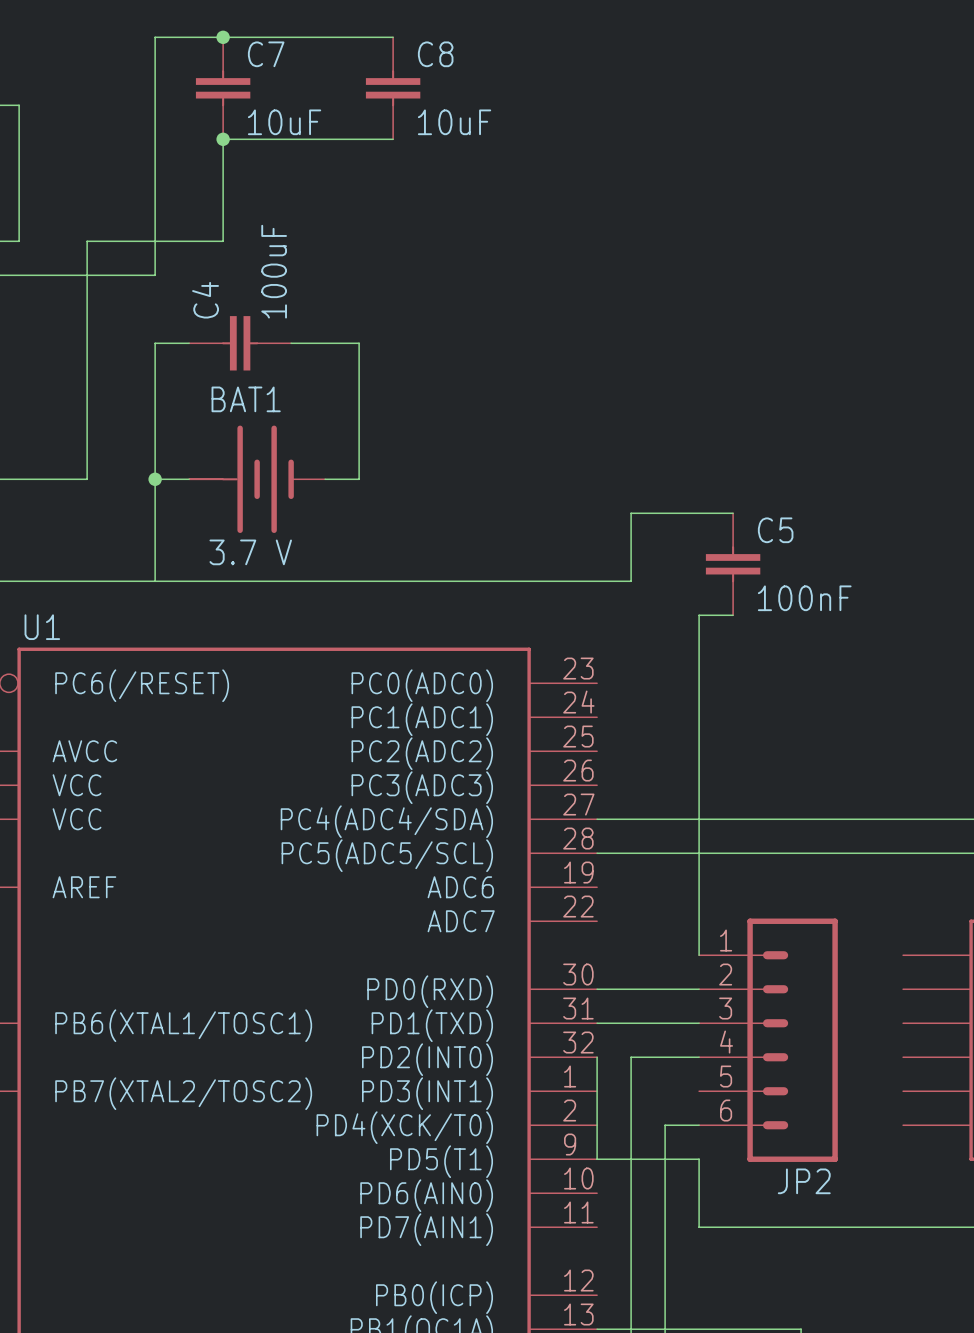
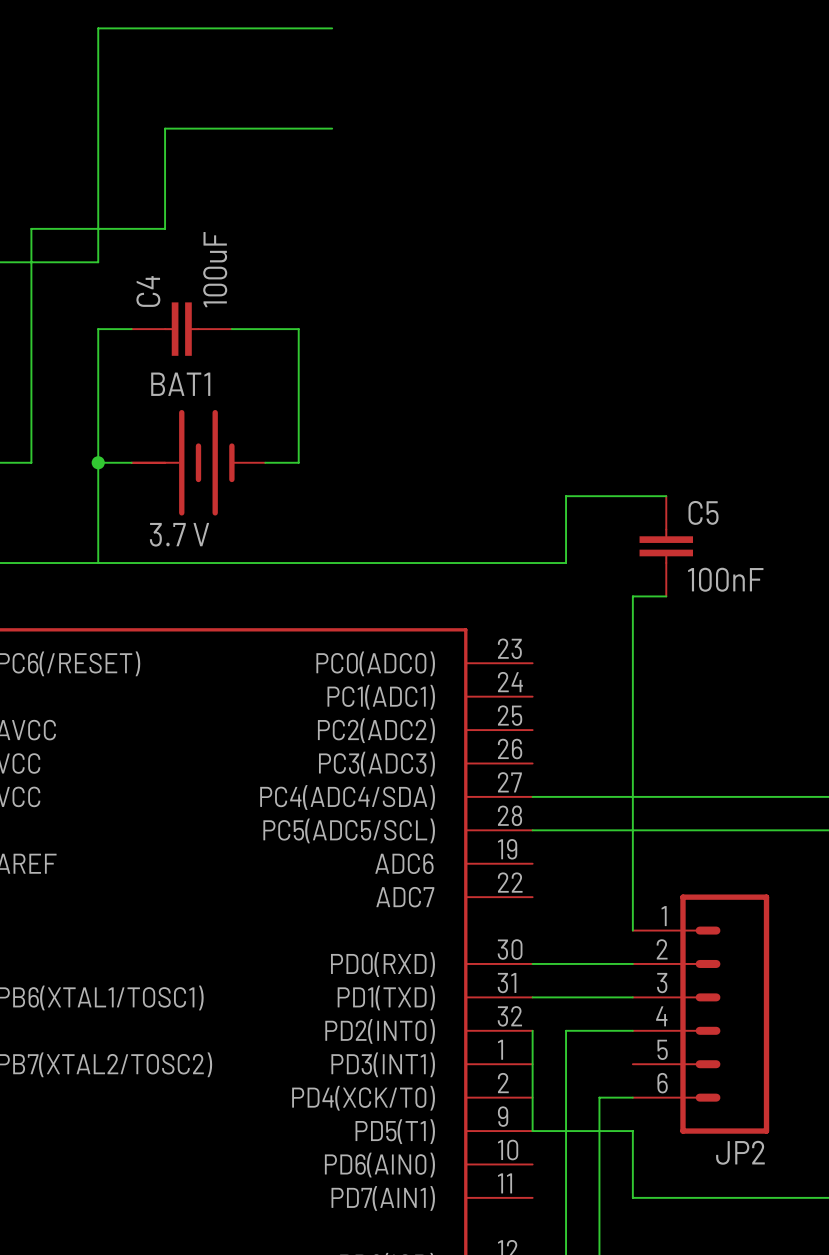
junction: (223, 37) -> none
C7: 10uF (223, 88) -> none
C8: 10uF (393, 88) -> none
junction: (223, 139) -> none

